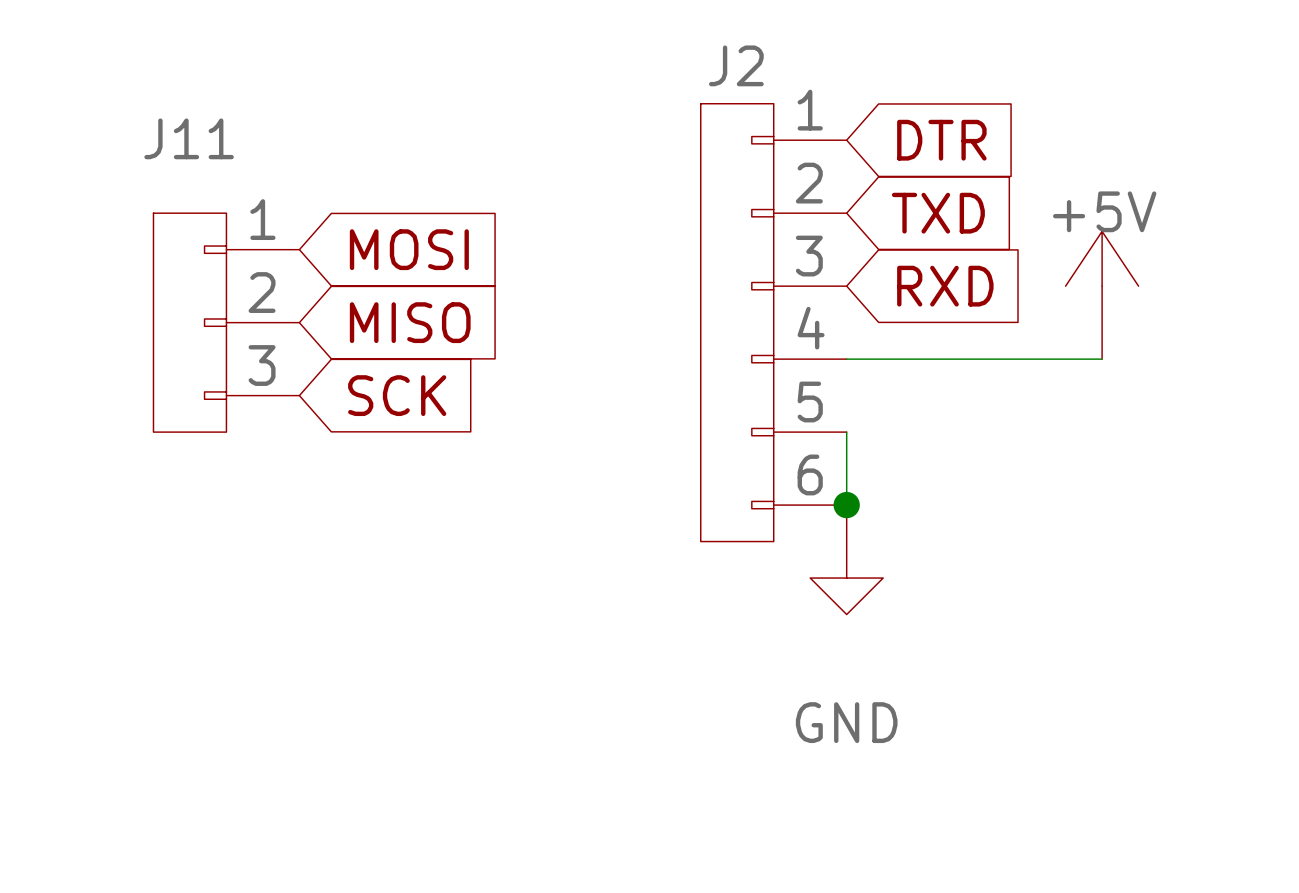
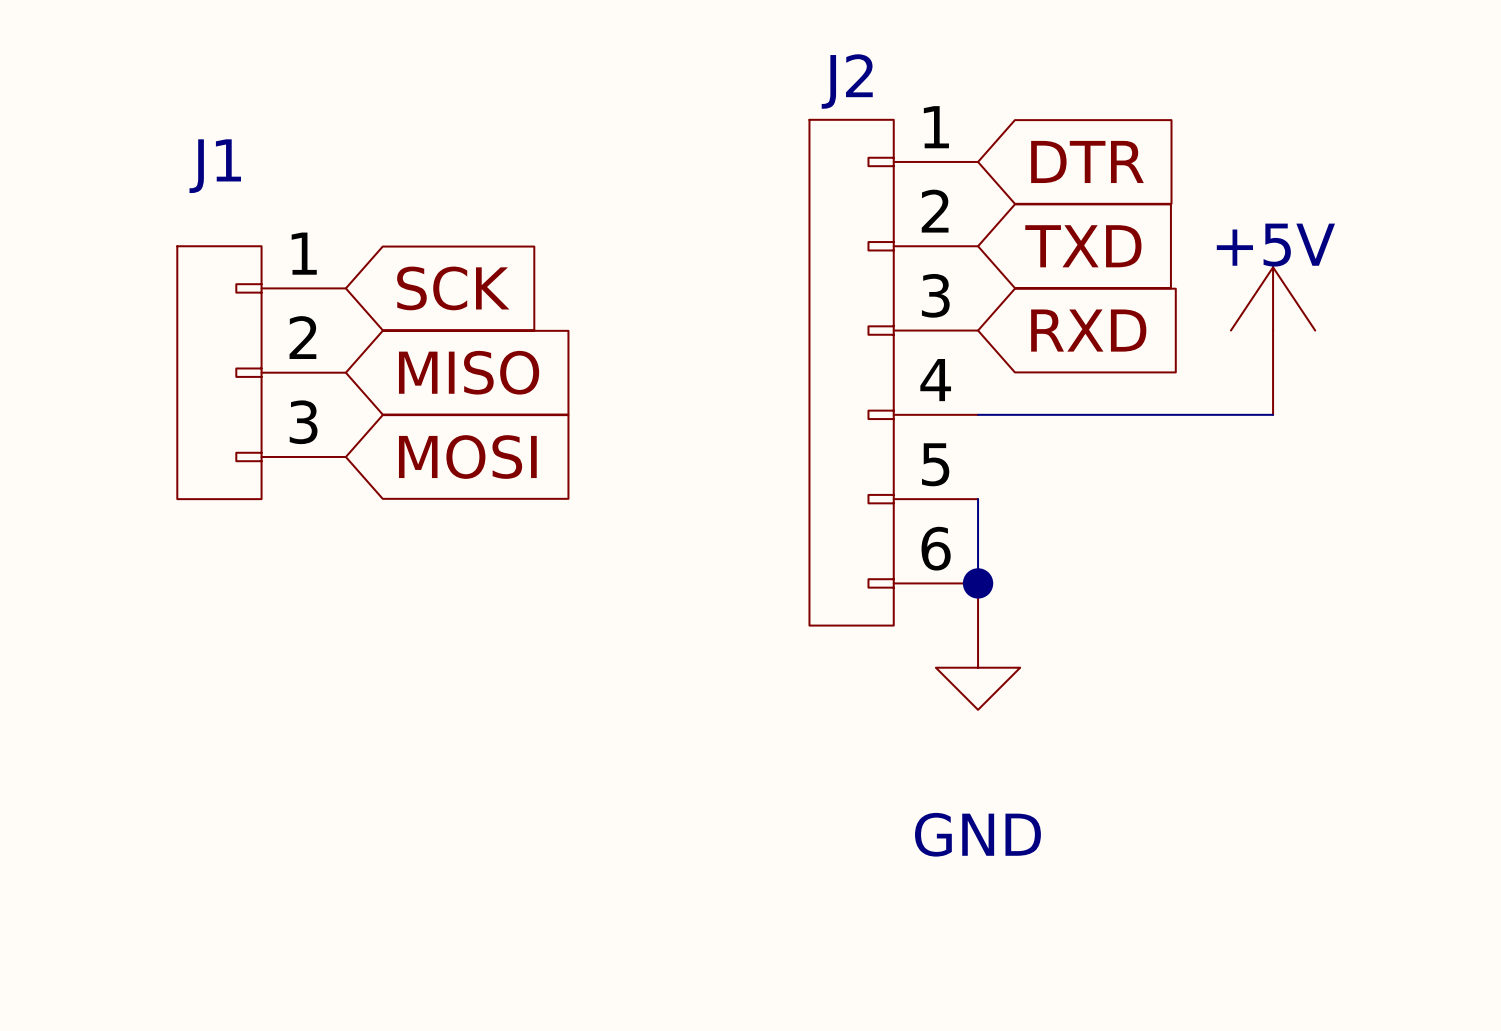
J11 name: J11 (189, 138) -> J1 (215, 166)
global label: MOSI (409, 249) -> SCK (453, 288)
global label: SCK (397, 395) -> MOSI (467, 457)

